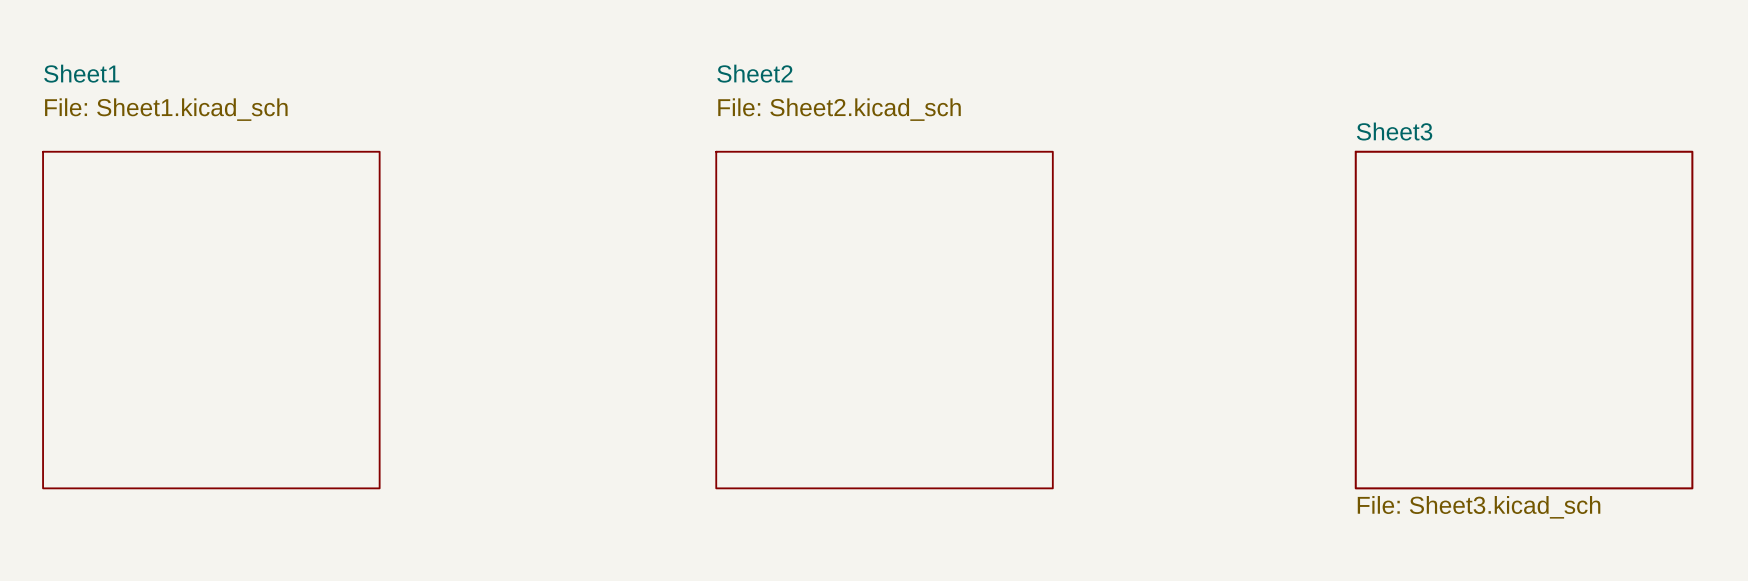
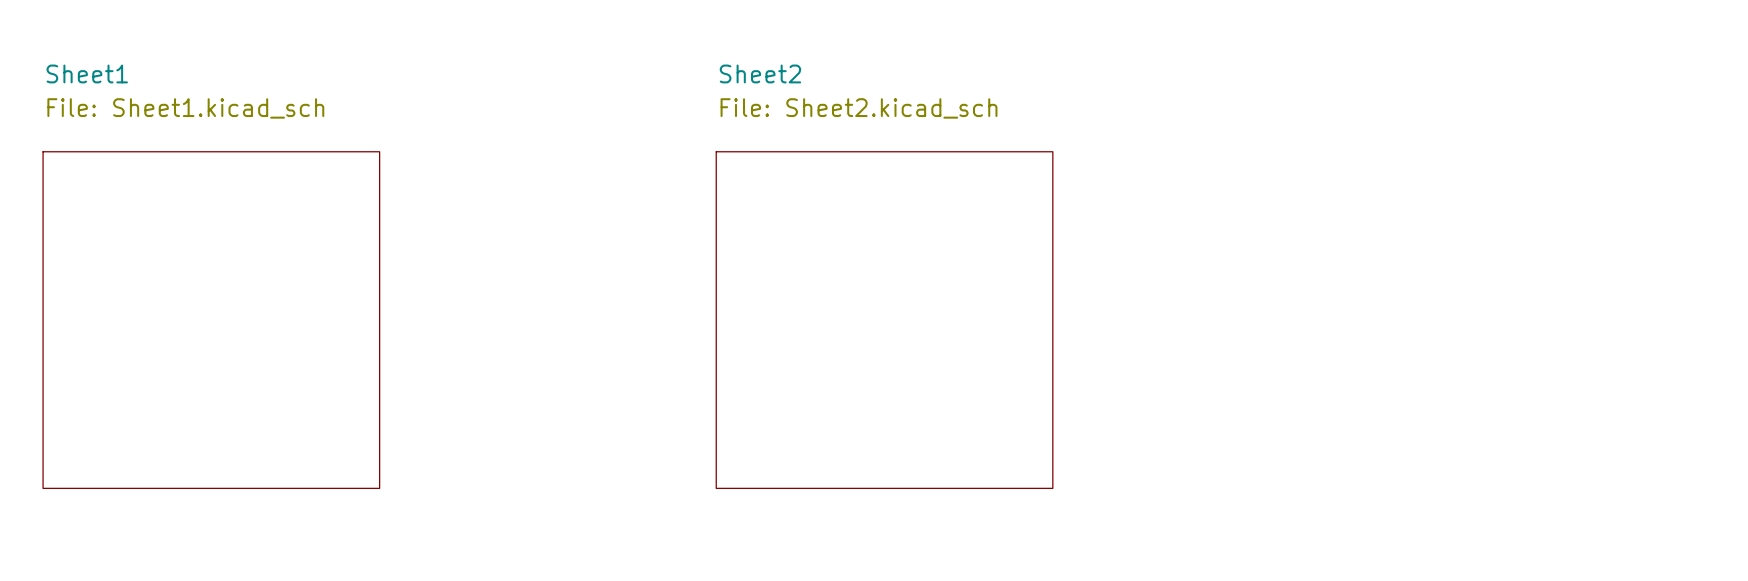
sheet Sheet3: File: Sheet3.kicad_sch (1524, 320) -> none

